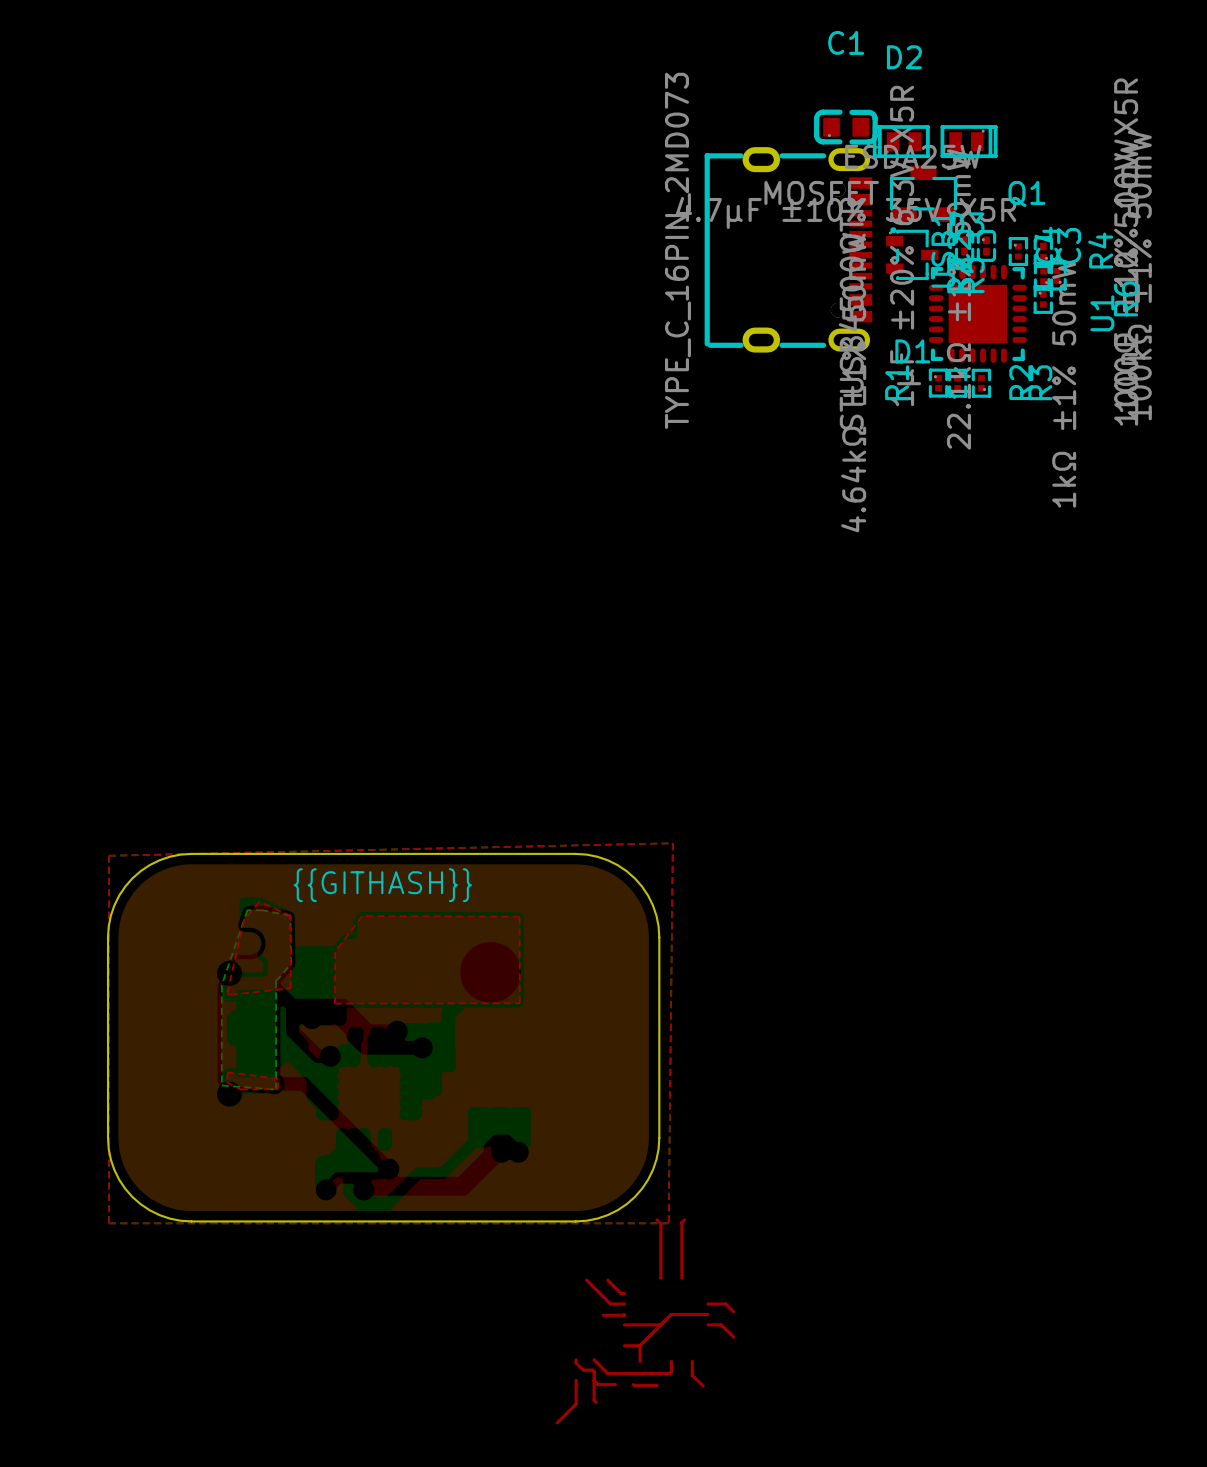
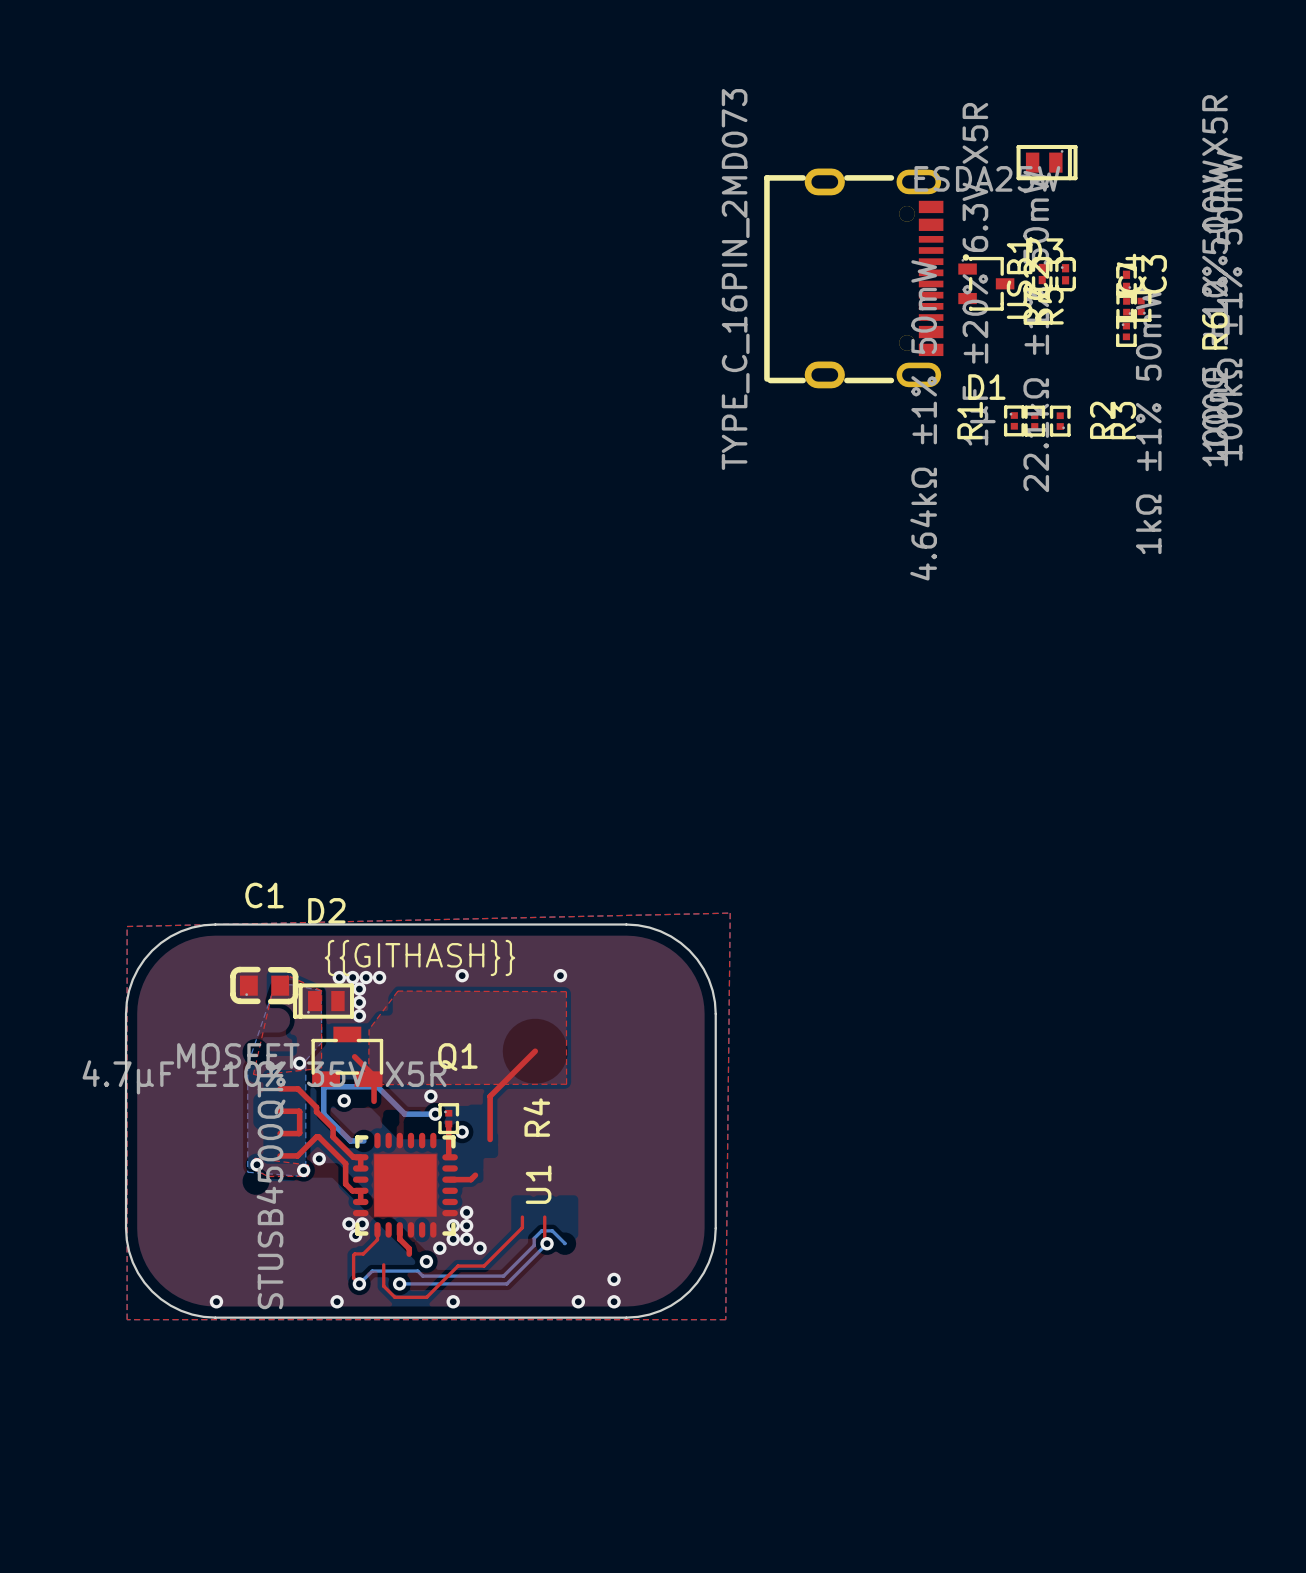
C1 position: (845, 127) -> (264, 985)
D2 position: (901, 141) -> (323, 1001)
Q1 position: (923, 193) -> (347, 1056)
R4 position: (1018, 251) -> (448, 1118)
U1 position: (977, 313) -> (405, 1185)
via: none -> (462, 975)
via: none -> (560, 975)
via: none -> (339, 977)
via: none -> (352, 977)
via: none -> (366, 977)
via: none -> (379, 977)
via: none -> (359, 989)
via: none -> (359, 1002)
via: none -> (359, 1015)
top track: none -> (535, 1051) (490, 1096) (490, 1139)
top track: none -> (354, 1056) (374, 1076) (374, 1101)
via: none -> (299, 1063)
top track: none -> (280, 1088) (298, 1088) (333, 1128) (333, 1136) (353, 1157) (360, 1157) (360, 1168)
via: none -> (430, 1096)
via: none -> (344, 1100)
top track: none -> (280, 1111) (299, 1111) (299, 1133) (280, 1133)
bottom track: none -> (435, 1114) (404, 1114) (377, 1086) (324, 1086) (323, 1114) (350, 1140) (363, 1140)
via: none -> (435, 1114)
top track: none -> (448, 1123) (450, 1157)
via: none -> (462, 1132)
top track: none -> (280, 1155) (297, 1155) (316, 1136) (318, 1136) (345, 1163) (345, 1183) (352, 1190) (360, 1190) (360, 1201)
via: none -> (319, 1158)
via: none -> (256, 1164)
via: none -> (303, 1170)
top track: none -> (475, 1175) (470, 1179) (450, 1179)
via: none -> (466, 1212)
top track: none -> (522, 1217) (522, 1227) (484, 1266) (457, 1266) (426, 1297) (394, 1297) (383, 1286) (383, 1264)
top track: none -> (544, 1217) (544, 1241) (547, 1243)
via: none -> (348, 1223)
via: none -> (362, 1223)
via: none -> (453, 1225)
via: none -> (466, 1225)
top track: none -> (377, 1229) (377, 1239) (363, 1253) (353, 1255) (353, 1278) (359, 1283)
top track: none -> (399, 1229) (399, 1239) (409, 1248) (409, 1254)
via: none -> (355, 1235)
via: none -> (453, 1239)
via: none -> (466, 1239)
bottom track: none -> (547, 1243) (506, 1283) (399, 1283)
via: none -> (547, 1243)
bottom track: none -> (564, 1243) (552, 1230) (541, 1230) (534, 1238) (534, 1245) (503, 1276) (422, 1276) (417, 1271) (372, 1271) (359, 1283)
via: none -> (439, 1248)
via: none -> (480, 1248)
via: none -> (426, 1261)
via: none -> (614, 1279)
via: none -> (359, 1283)
via: none -> (399, 1283)
via: none -> (216, 1301)
via: none -> (337, 1301)
via: none -> (453, 1301)
via: none -> (578, 1301)
via: none -> (614, 1301)
top track: (657, 1219) (661, 1223) (660, 1277) -> none
top track: (684, 1219) (681, 1222) (681, 1277) -> none
top track: (586, 1280) (610, 1304) (624, 1304) -> none
top track: (607, 1280) (621, 1293) (624, 1293) -> none
top track: (708, 1304) (725, 1304) (733, 1311) -> none
top track: (624, 1314) (603, 1315) -> none
top track: (708, 1314) (671, 1314) (639, 1345) (624, 1345) -> none
top track: (624, 1324) (660, 1324) -> none
top track: (708, 1324) (721, 1324) (733, 1337) -> none
top track: (640, 1345) (640, 1361) -> none
top track: (576, 1359) (576, 1362) (583, 1370) (594, 1371) (594, 1400) (596, 1402) -> none
top track: (594, 1359) (607, 1373) (669, 1373) (671, 1361) -> none
top track: (692, 1361) (692, 1375) (703, 1386) -> none
top track: (576, 1380) (576, 1404) (557, 1422) -> none
top track: (594, 1380) (598, 1384) (615, 1384) -> none
top track: (633, 1384) (657, 1385) -> none

